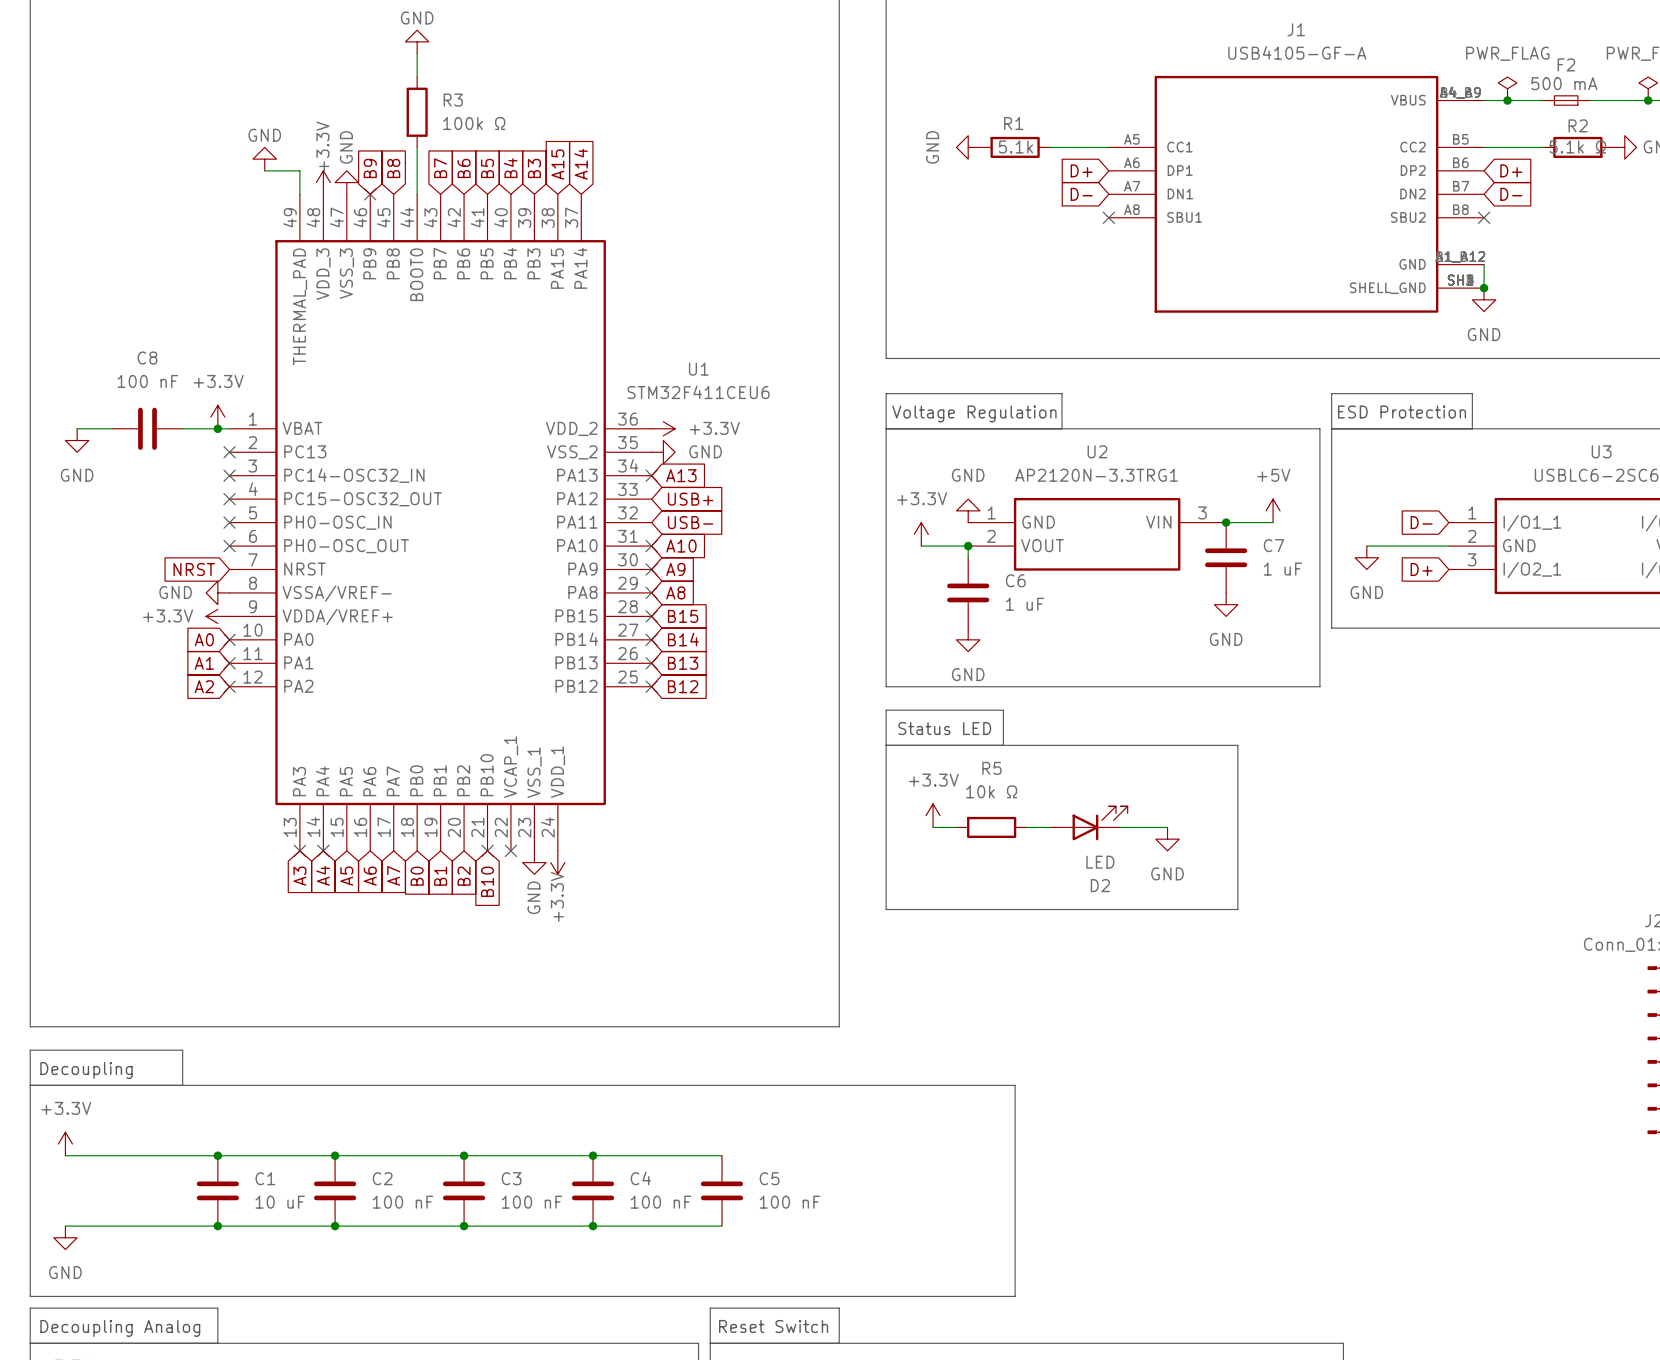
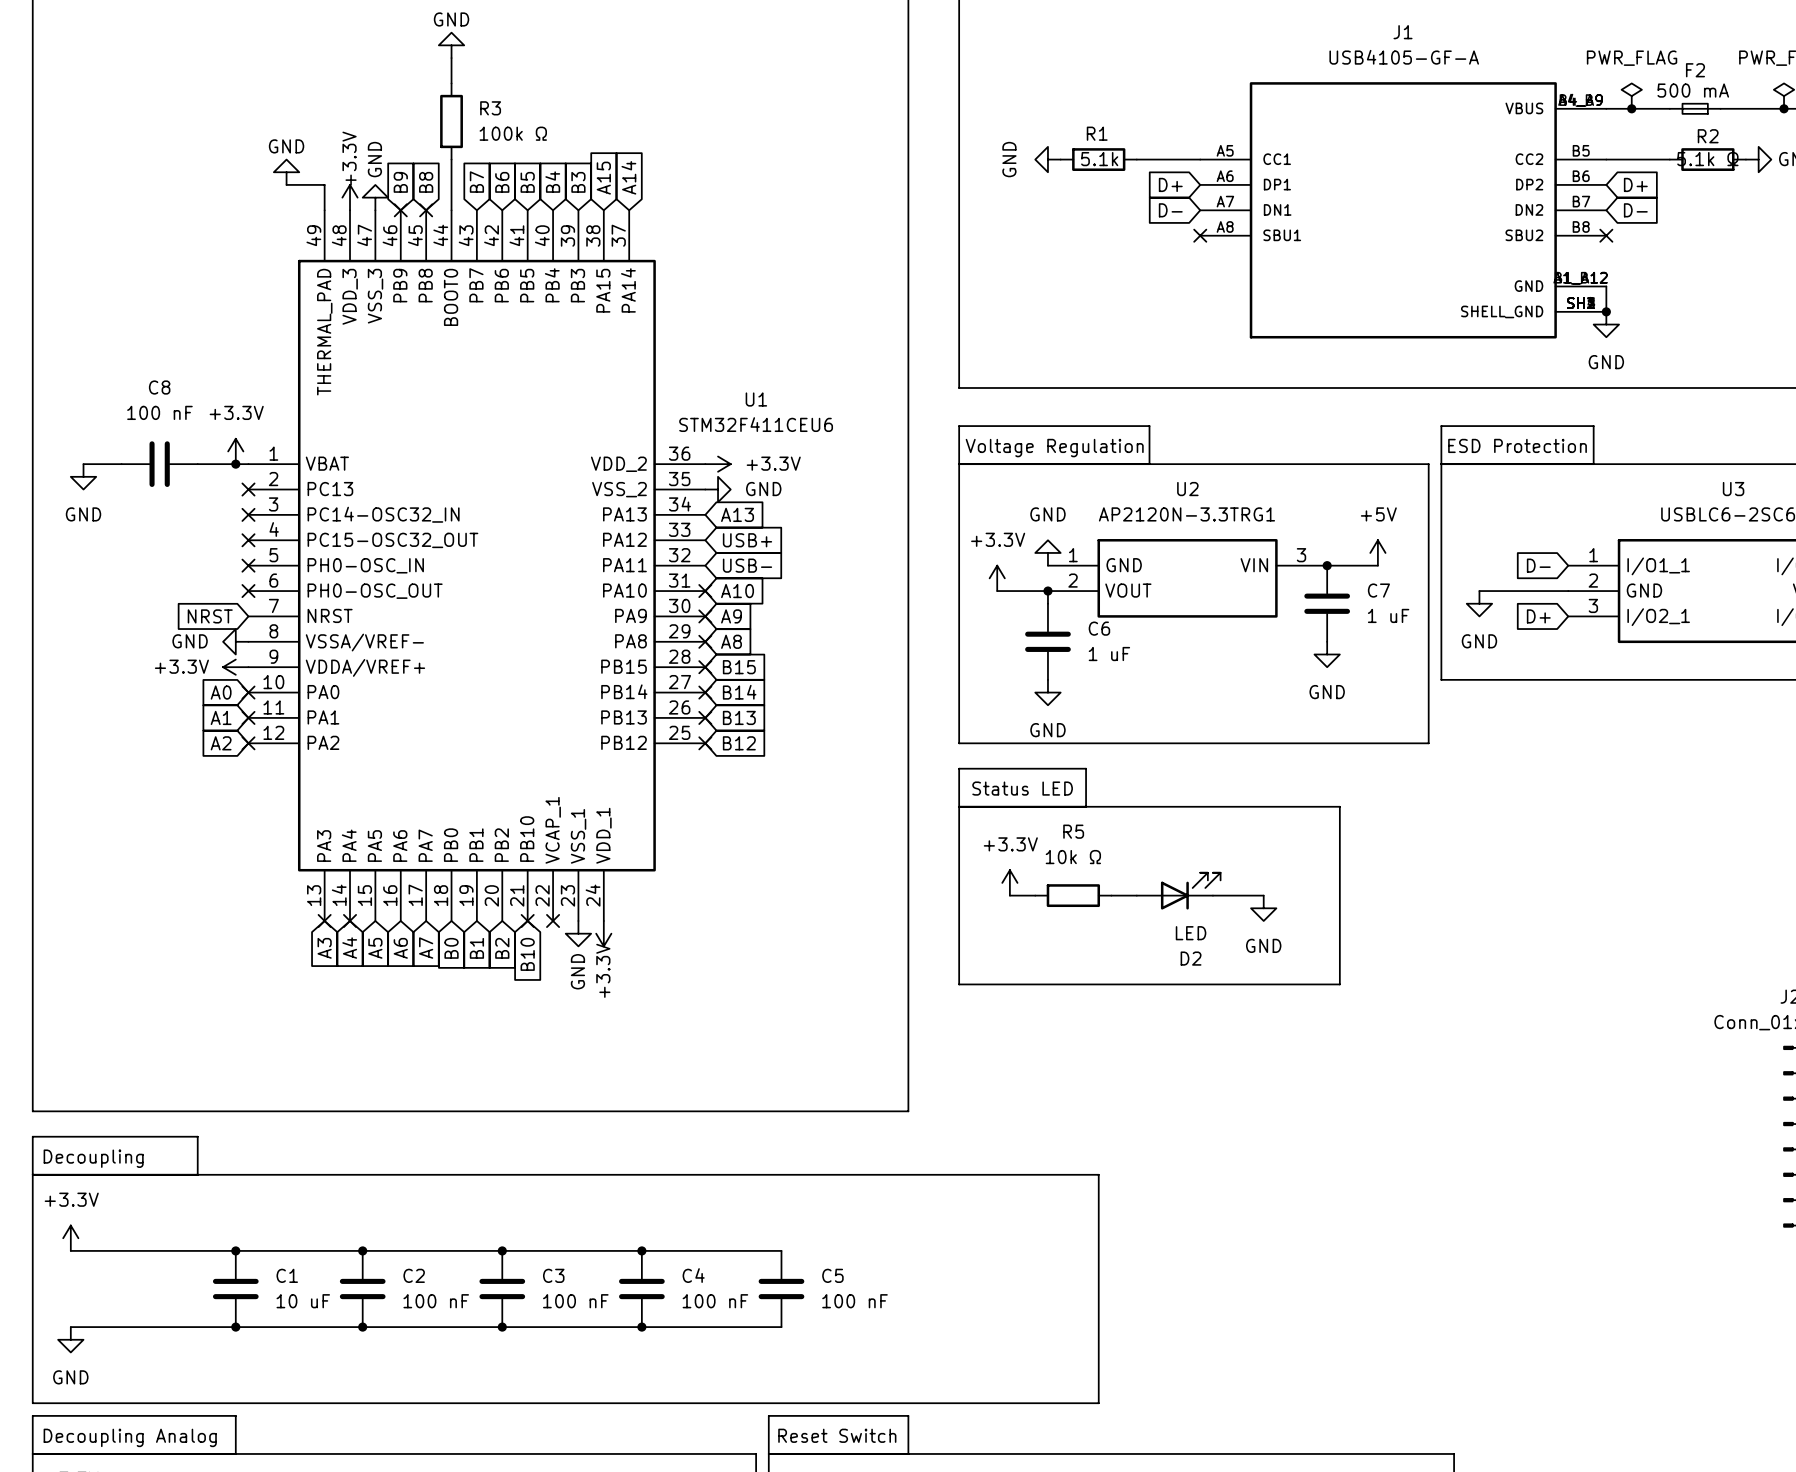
no-connect mark: none -> (426, 210)
no-connect mark: (651, 475) -> none

